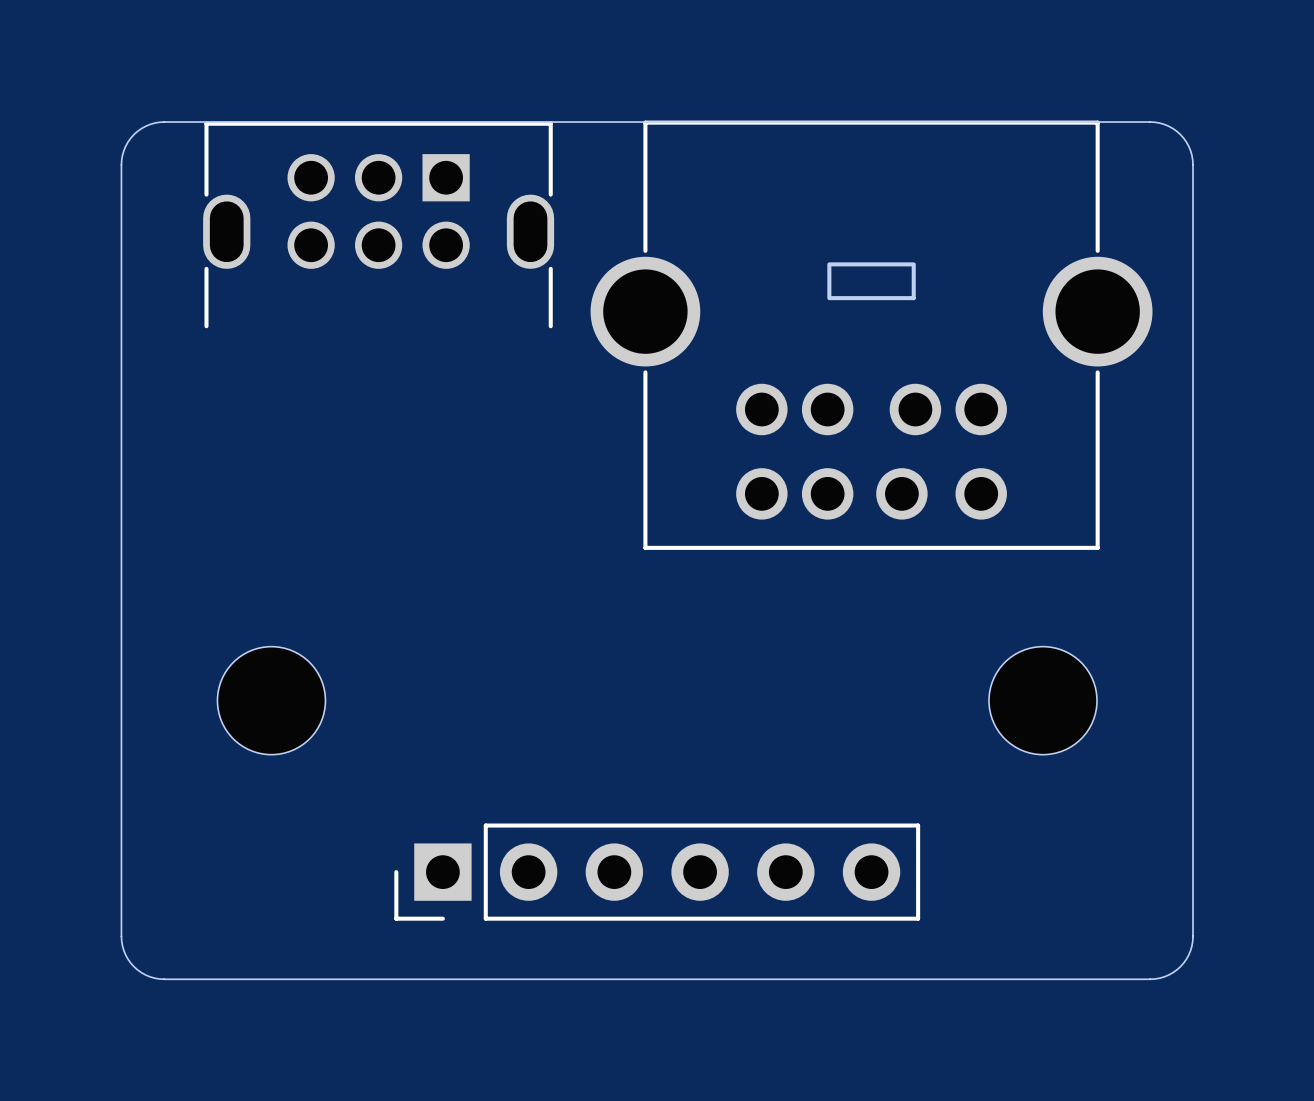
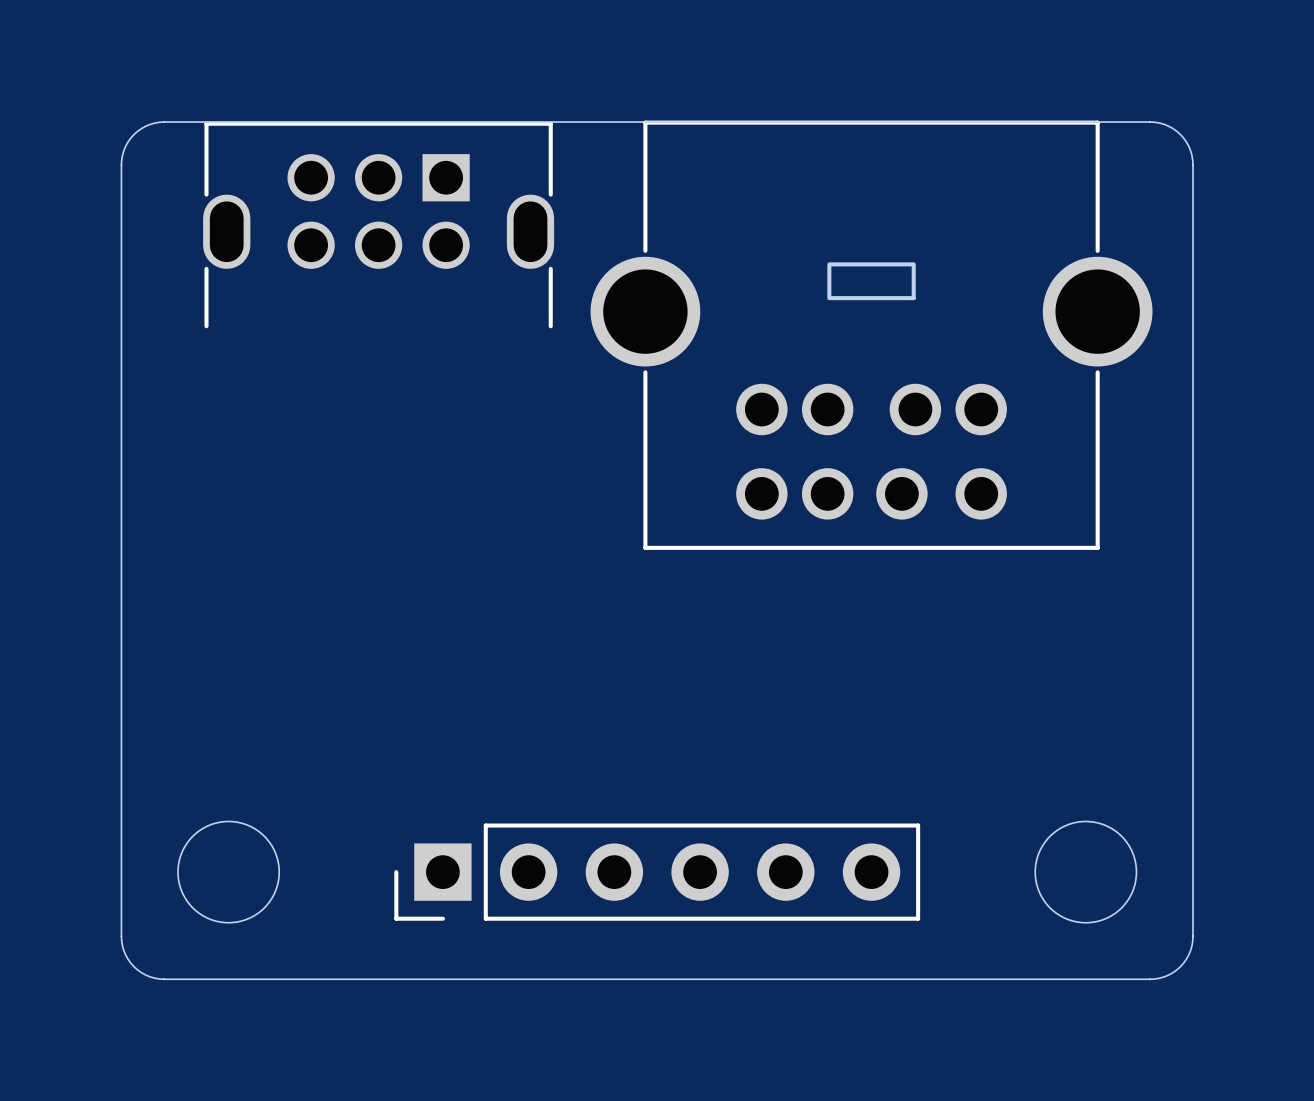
part: (271, 700) -> none
part: (1042, 700) -> none
round board edge: none -> [177, 820, 281, 924]
round board edge: none -> [1034, 820, 1138, 924]

